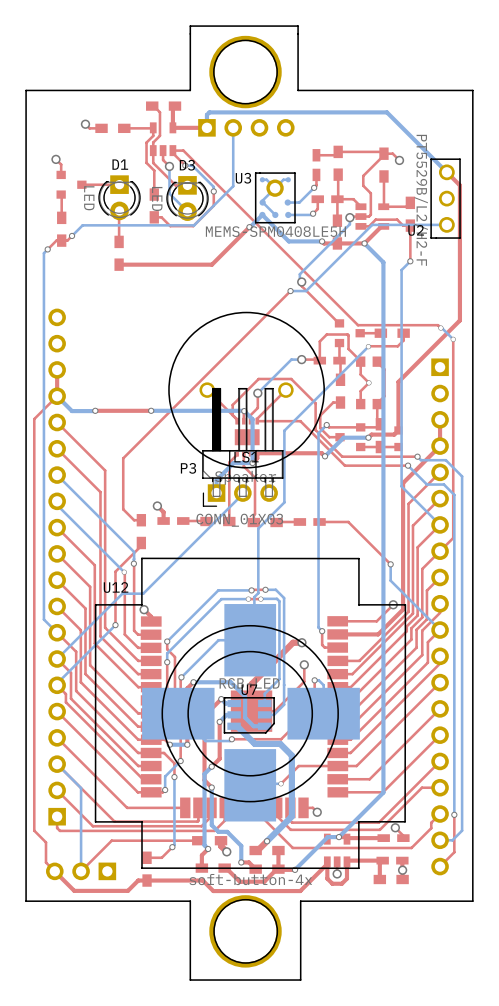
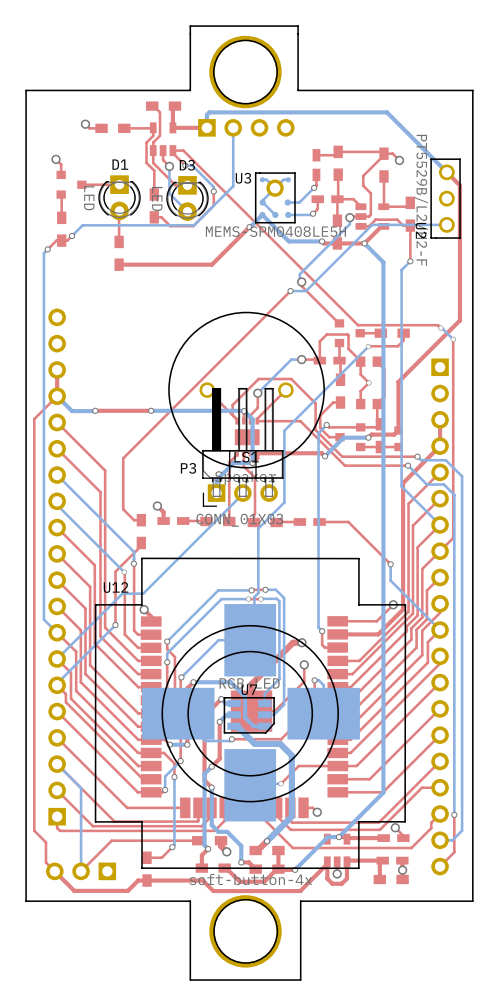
U2 name rotation: 0° (416, 230) -> 90° clockwise (420, 230)

